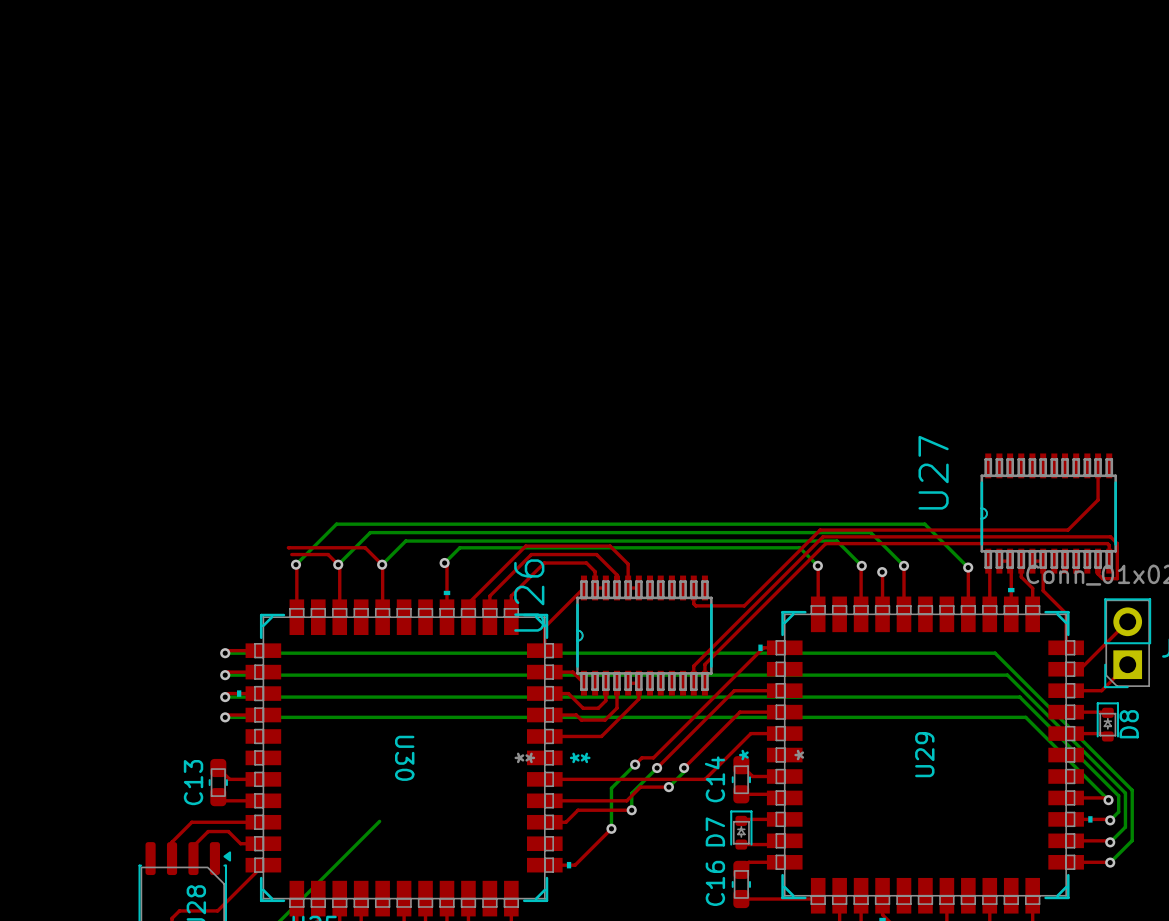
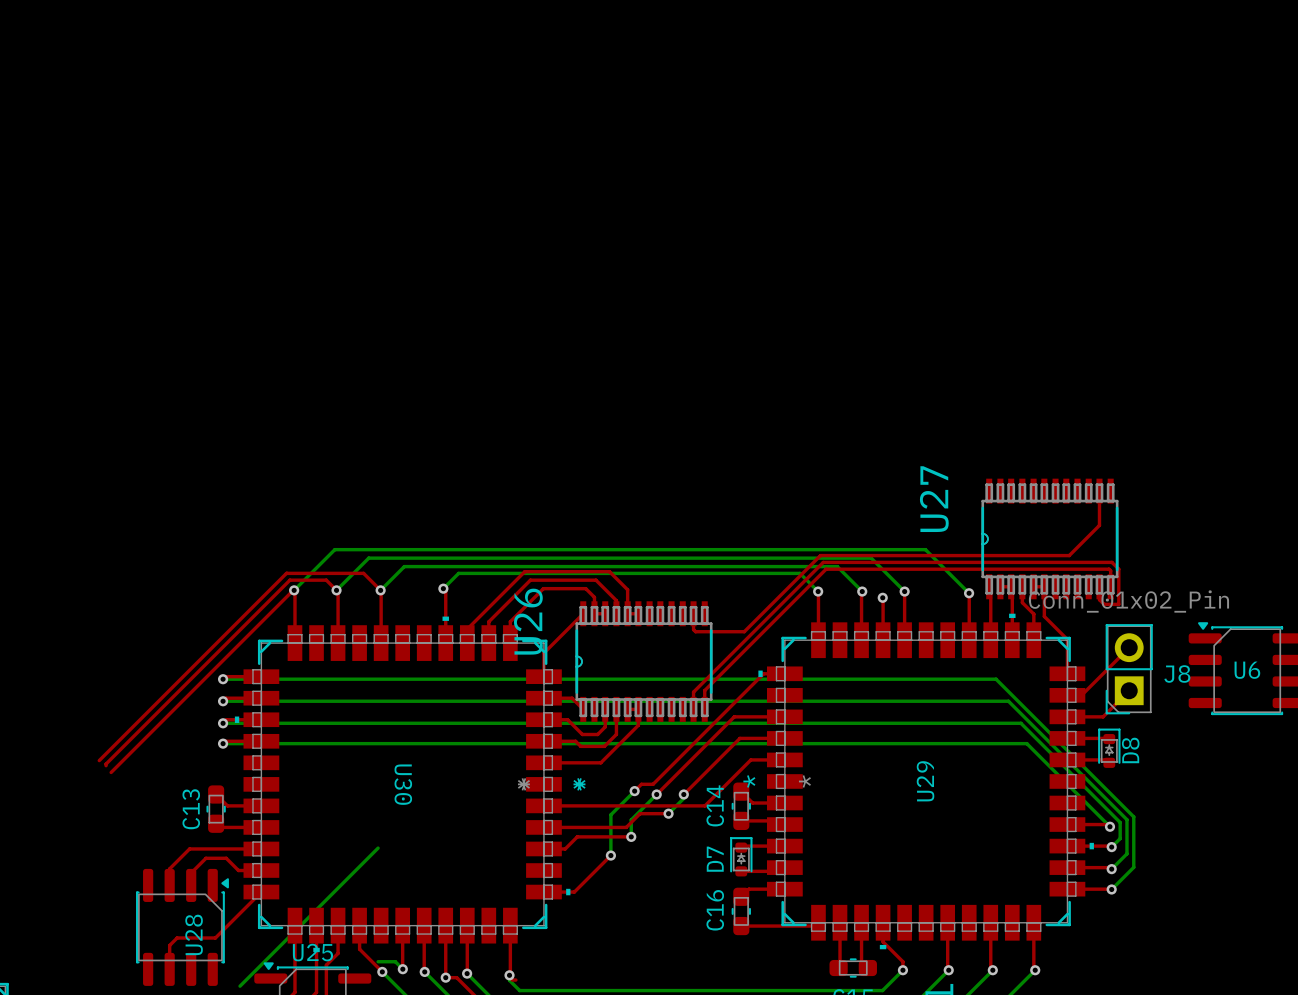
top track: none -> (286, 573) (99, 760)
top track: none -> (289, 580) (106, 765)
top track: none -> (293, 590) (111, 772)

